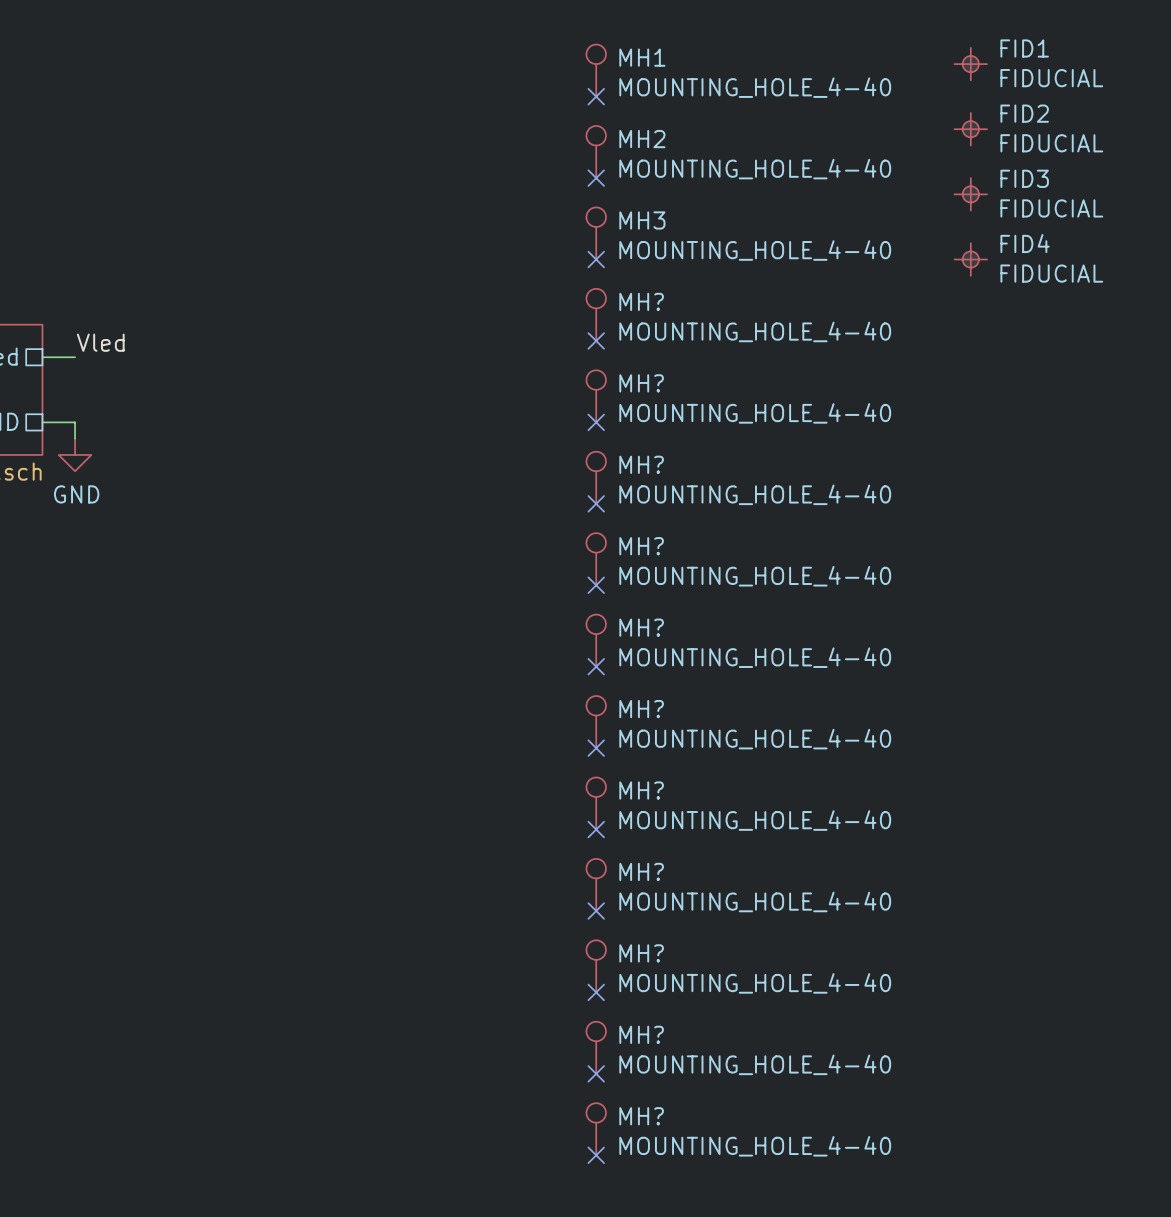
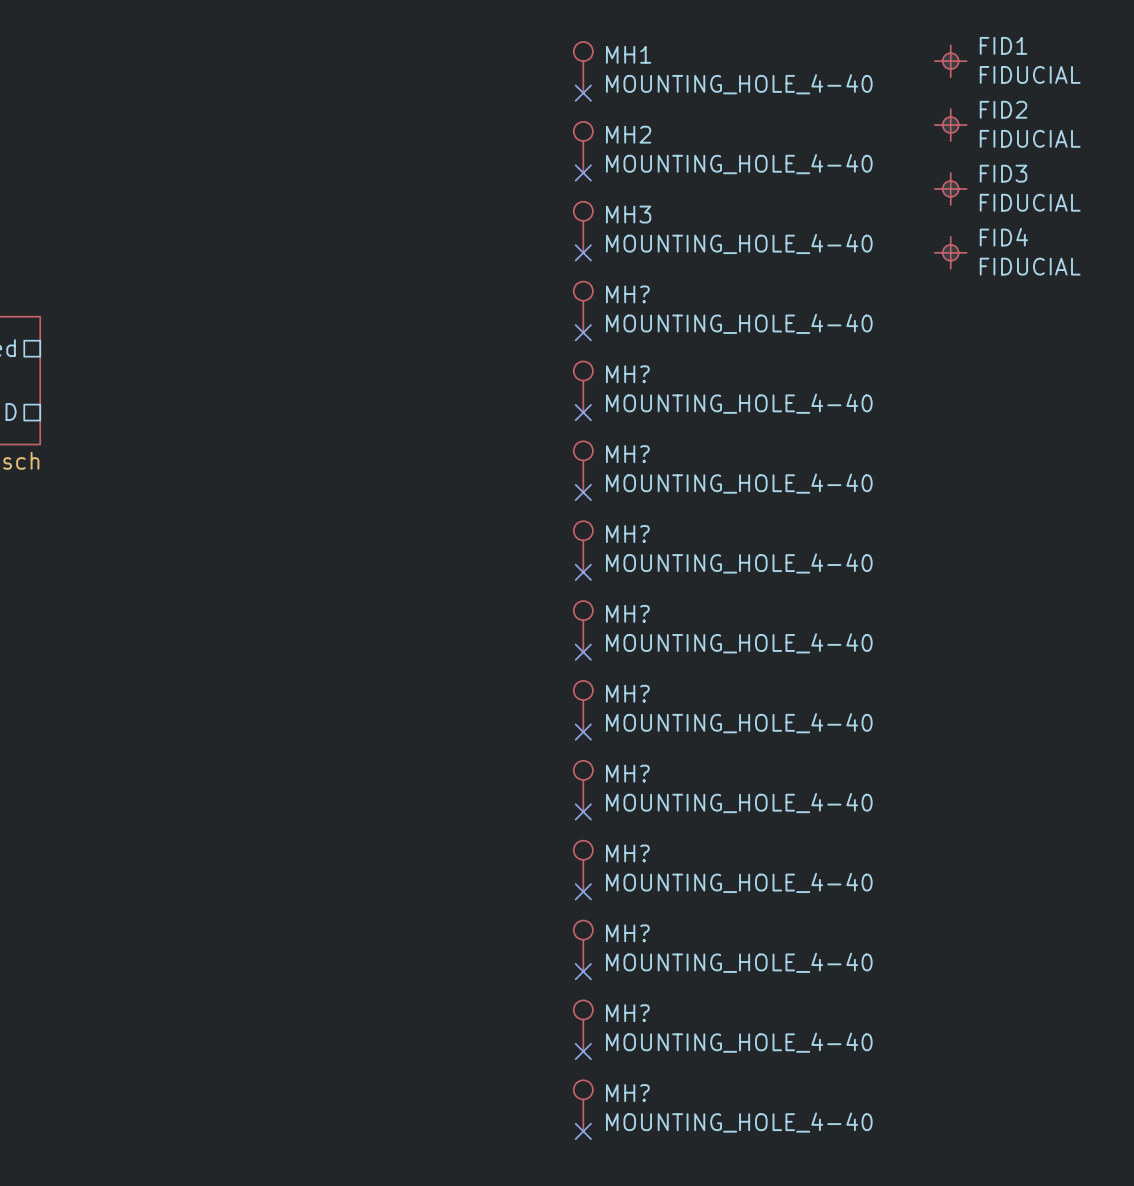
label: Vled (100, 342) -> none
wire: (42, 357) (75, 357) -> none
wire: (42, 422) (75, 422) (75, 438) -> none
power symbol: GND (75, 454) -> none

